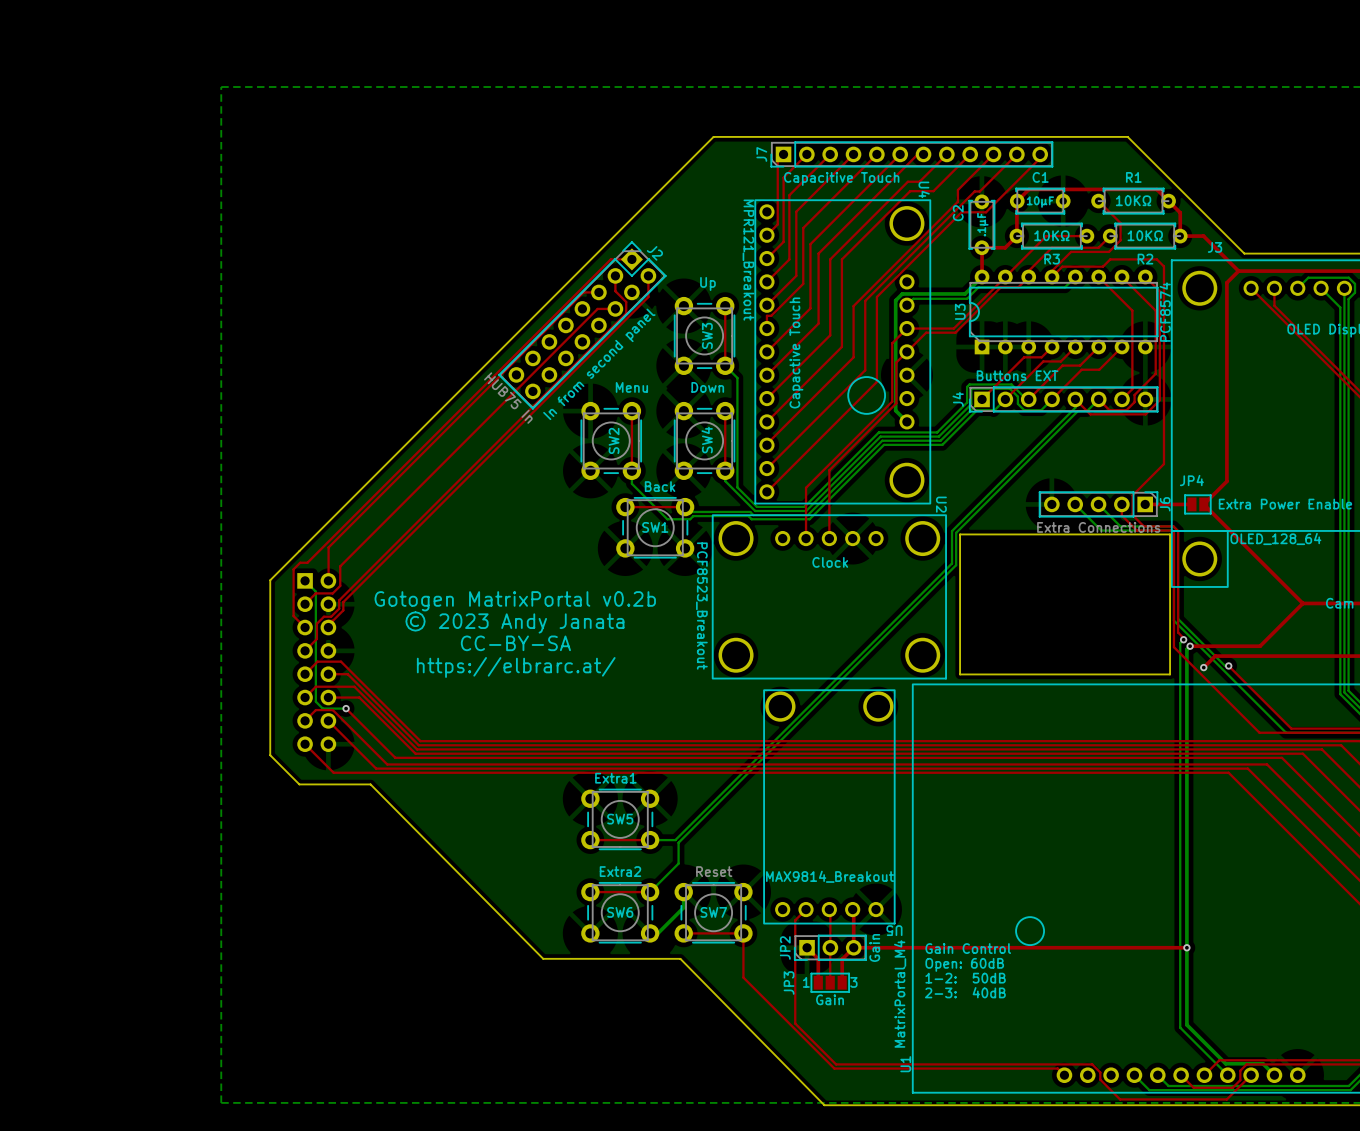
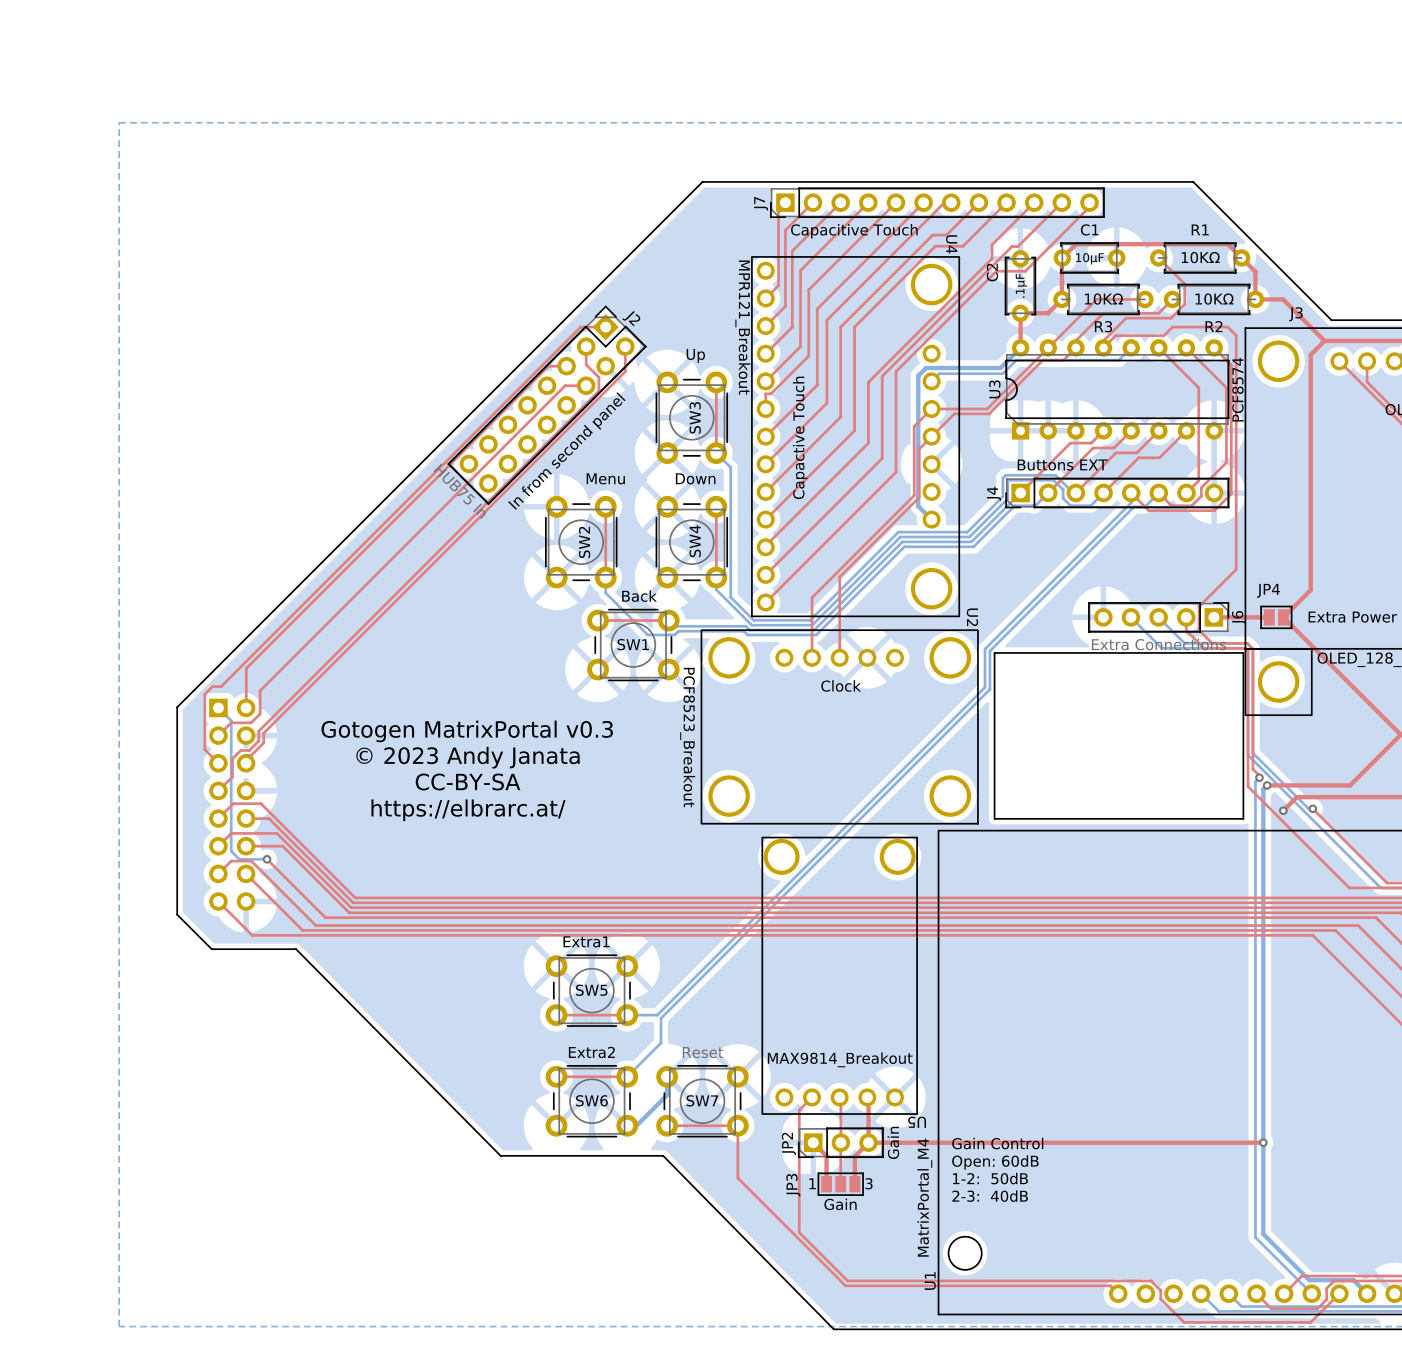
drawing: [847, 376, 886, 415] -> none
text: Gotogen MatrixPortal v0.2b (515, 601) -> Gotogen MatrixPortal v0.3 (467, 731)
drawing: [1015, 916, 1045, 946] -> none
round board edge: none -> [948, 1236, 983, 1271]

